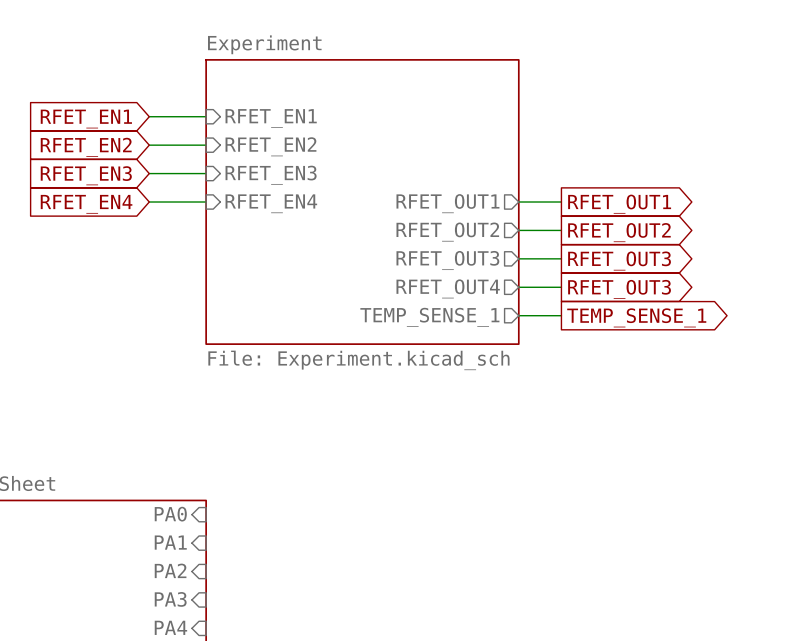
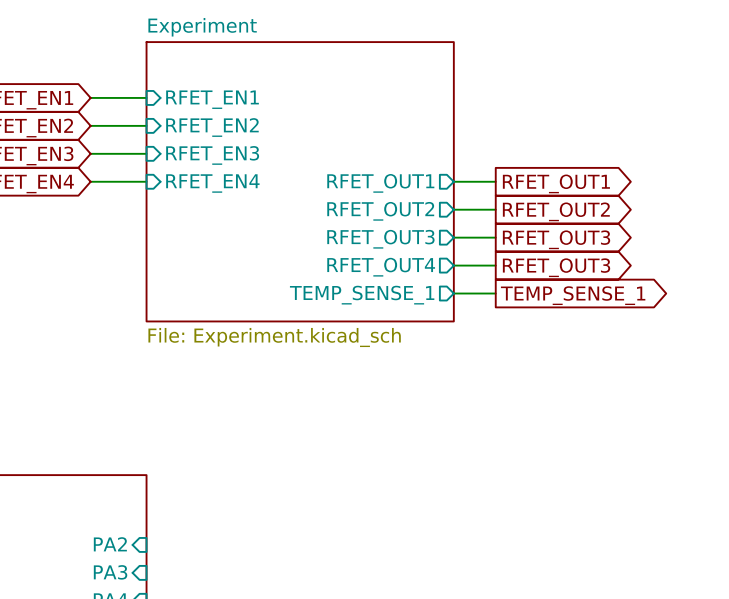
sheet pin: PA0 (170, 514) -> none
sheet pin: PA1 (170, 542) -> none

